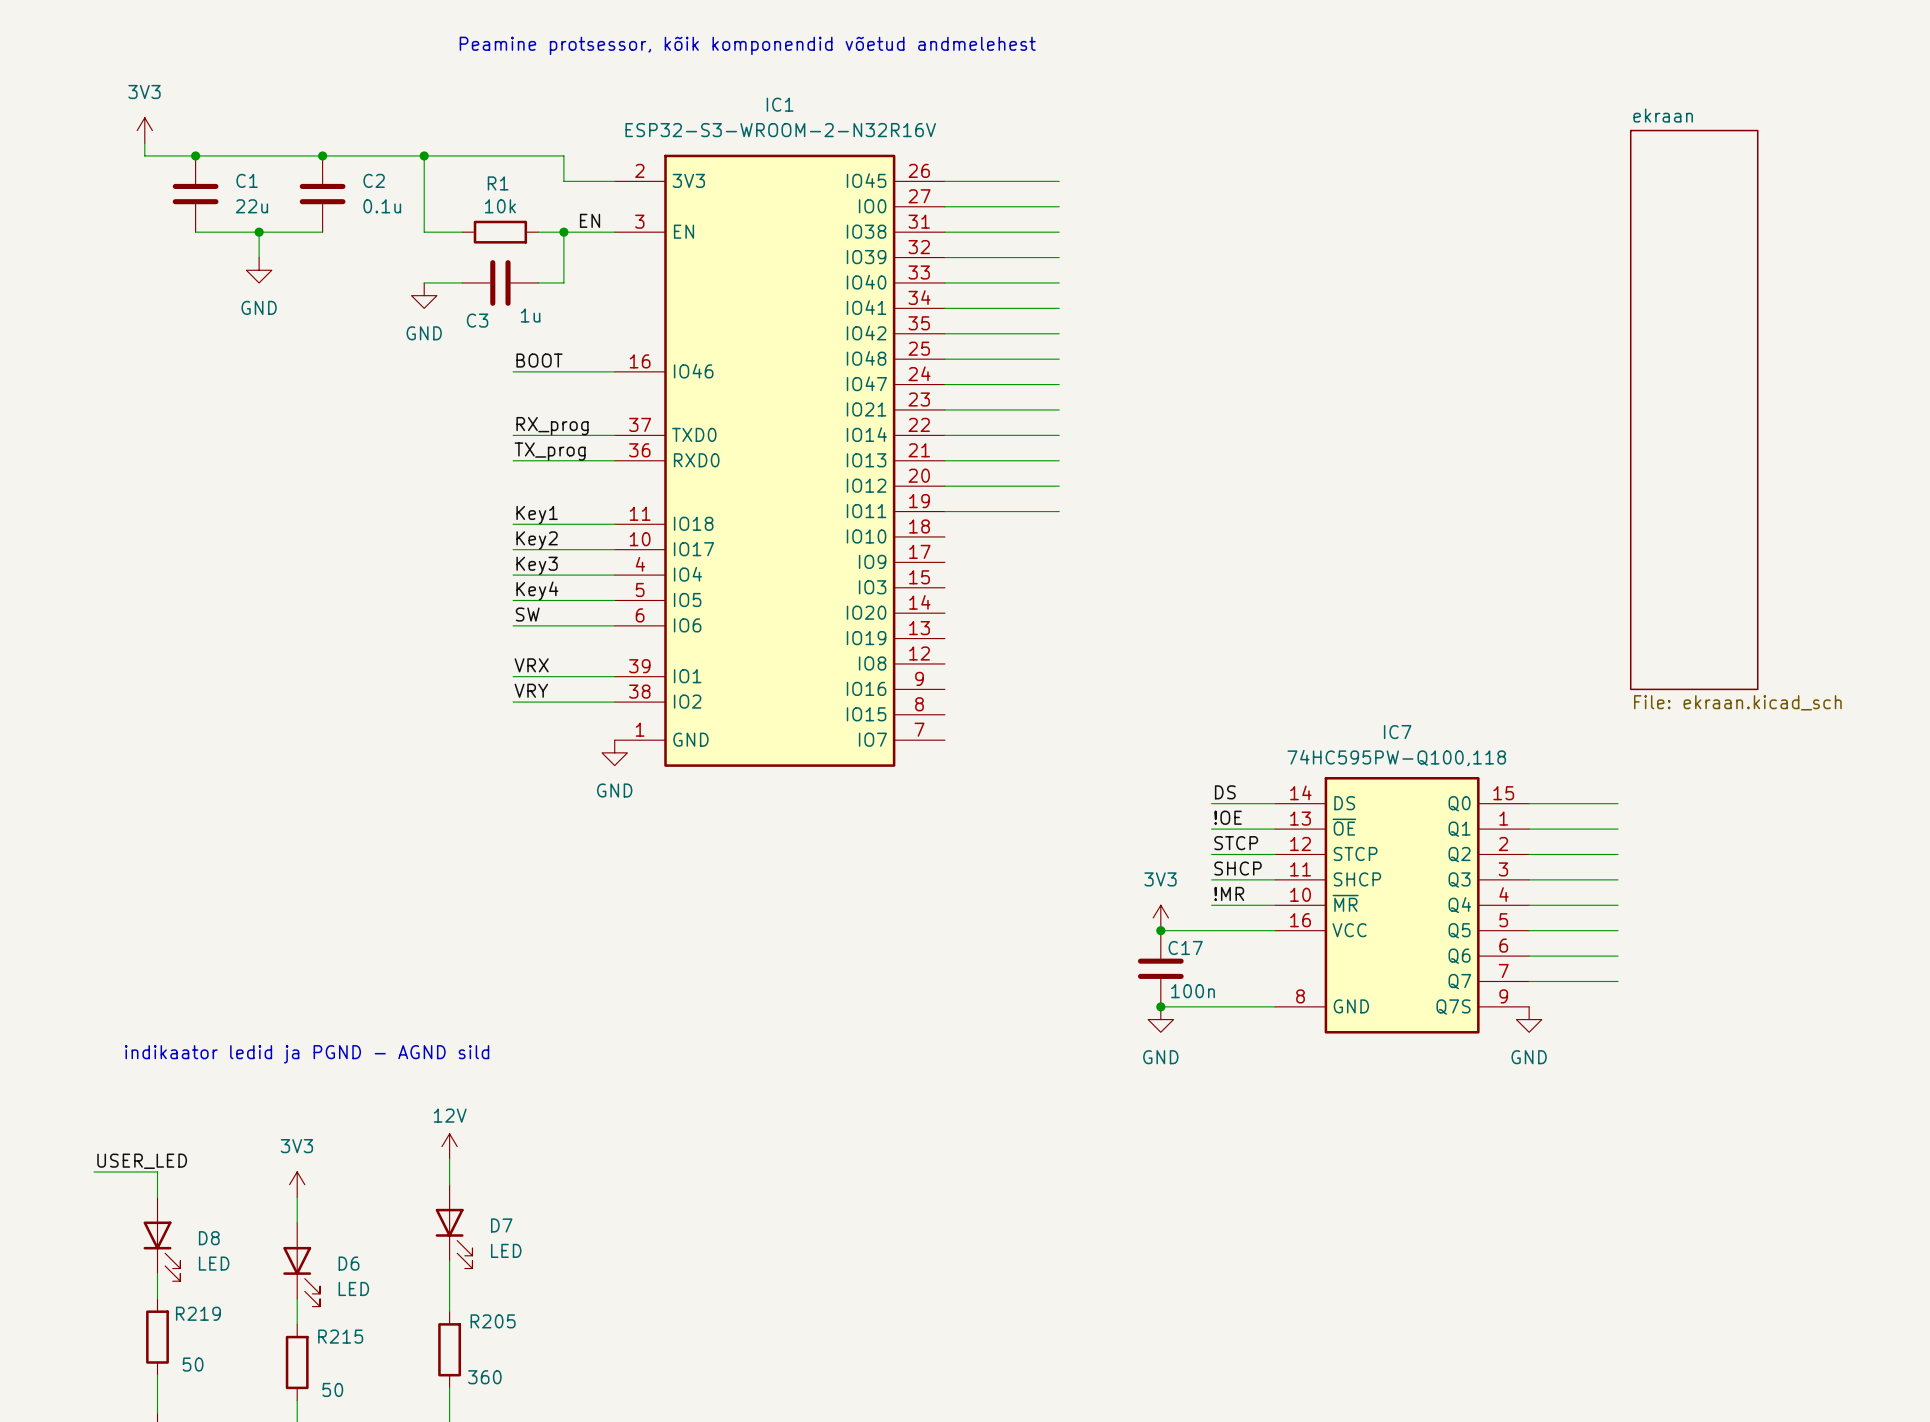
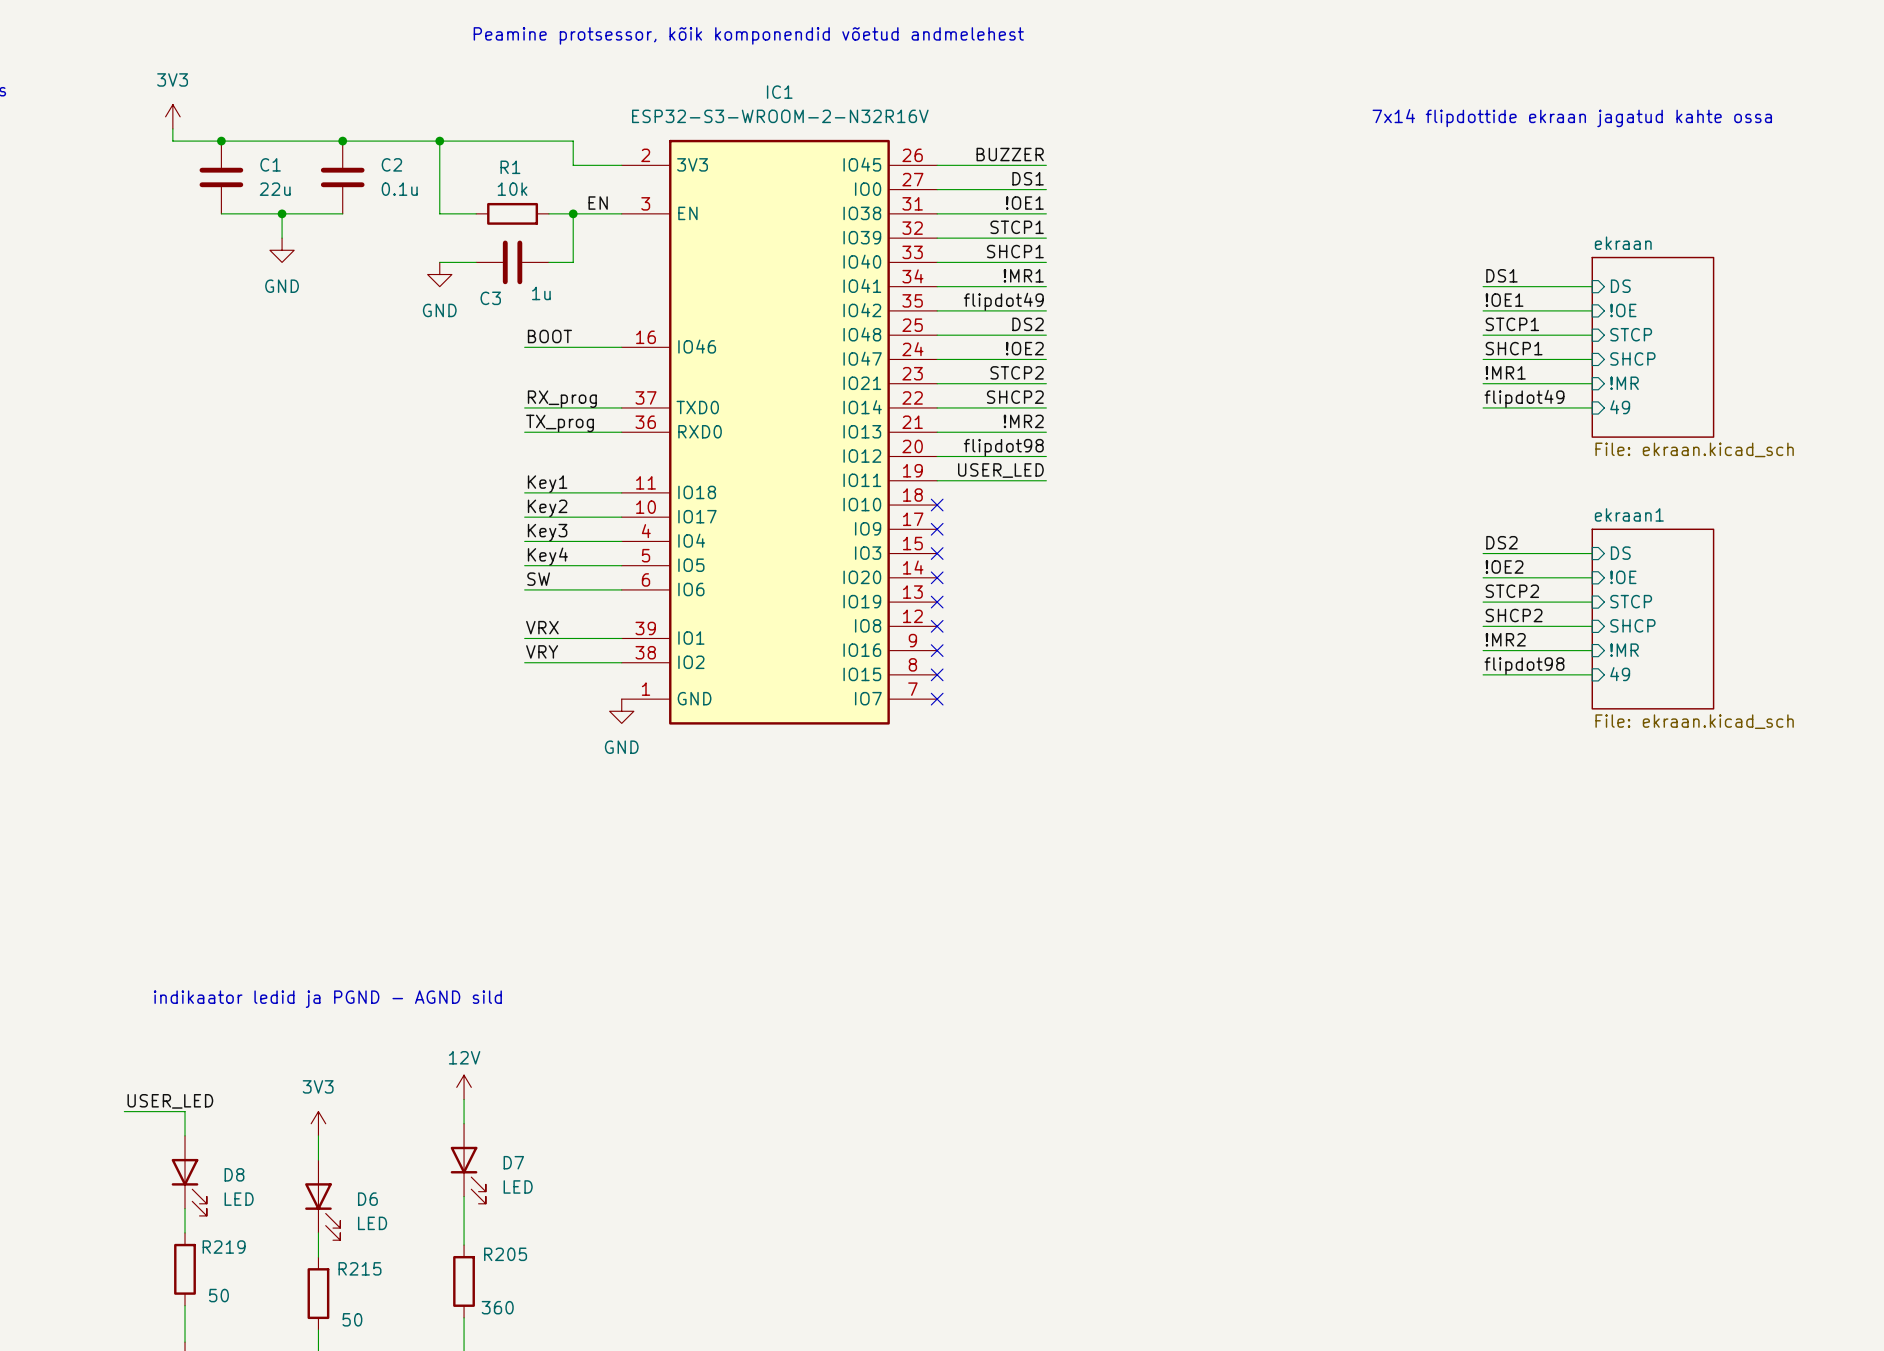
text: none -> 7x14 flipdottide ekraan jagatud kahte ossa (1572, 118)
label: none -> BUZZER (1010, 154)
label: none -> DS1 (1028, 178)
label: none -> !OE1 (1024, 203)
label: none -> STCP1 (1017, 227)
label: none -> SHCP1 (1015, 251)
label: none -> !MR1 (1023, 275)
label: none -> DS1 (1501, 275)
sheet pin: none -> DS (1620, 286)
wire: none -> (1483, 286) (1592, 286)
label: none -> !OE1 (1504, 300)
label: none -> flipdot49 (1003, 301)
wire: none -> (1483, 310) (1592, 310)
sheet pin: none -> !OE (1623, 310)
label: none -> DS2 (1028, 324)
label: none -> STCP1 (1512, 324)
sheet pin: none -> STCP (1631, 334)
wire: none -> (1483, 335) (1592, 335)
sheet ekraan: none -> File: ekraan.kicad_sch (1652, 347)
label: none -> !OE2 (1024, 348)
label: none -> SHCP1 (1514, 348)
wire: none -> (1483, 359) (1592, 359)
sheet pin: none -> SHCP (1632, 358)
label: none -> STCP2 (1017, 372)
label: none -> !MR1 (1505, 372)
wire: none -> (1483, 383) (1592, 383)
sheet pin: none -> !MR (1624, 383)
sheet ekraan: File: ekraan.kicad_sch (1694, 409) -> none
label: none -> SHCP2 (1015, 397)
label: none -> flipdot49 (1524, 398)
sheet pin: none -> 49 (1620, 407)
wire: none -> (1483, 407) (1592, 407)
label: none -> !MR2 (1023, 421)
label: none -> flipdot98 (1003, 447)
label: none -> USER_LED (1000, 470)
no-connect mark: none -> (937, 505)
no-connect mark: none -> (937, 529)
label: none -> DS2 (1501, 542)
no-connect mark: none -> (937, 553)
wire: none -> (1483, 553) (1592, 553)
sheet pin: none -> DS (1620, 553)
label: none -> !OE2 (1504, 566)
sheet pin: none -> !OE (1623, 577)
no-connect mark: none -> (937, 577)
wire: none -> (1483, 577) (1592, 577)
label: none -> STCP2 (1512, 591)
no-connect mark: none -> (937, 602)
wire: none -> (1483, 602) (1592, 602)
sheet pin: none -> STCP (1631, 601)
label: none -> SHCP2 (1514, 615)
sheet ekraan1: none -> File: ekraan.kicad_sch (1652, 619)
no-connect mark: none -> (937, 626)
wire: none -> (1483, 626) (1592, 626)
sheet pin: none -> SHCP (1632, 625)
label: none -> !MR2 (1505, 639)
sheet pin: none -> !MR (1624, 650)
no-connect mark: none -> (937, 650)
wire: none -> (1483, 650) (1592, 650)
label: none -> flipdot98 (1524, 666)
no-connect mark: none -> (937, 674)
wire: none -> (1483, 674) (1592, 674)
sheet pin: none -> 49 (1620, 674)
no-connect mark: none -> (937, 699)
label: DS (1225, 792) -> none
wire: (1211, 803) (1275, 803) -> none
wire: (1529, 803) (1618, 803) -> none
label: !OE (1228, 817) -> none
wire: (1211, 829) (1275, 829) -> none
wire: (1529, 829) (1618, 829) -> none
label: STCP (1236, 843) -> none
wire: (1211, 854) (1275, 854) -> none
wire: (1529, 854) (1618, 854) -> none
label: SHCP (1238, 868) -> none
wire: (1211, 879) (1275, 879) -> none
wire: (1529, 879) (1618, 879) -> none
label: !MR (1229, 893) -> none
wire: (1211, 905) (1275, 905) -> none
IC7: 74HC595PW-Q100,118 (1402, 905) -> none
wire: (1529, 905) (1618, 905) -> none
power symbol: 3V3 (1160, 917) -> none
wire: (1160, 930) (1275, 930) -> none
junction: (1160, 930) -> none
wire: (1529, 930) (1618, 930) -> none
wire: (1529, 956) (1618, 956) -> none
C17: 100n (1160, 968) -> none
wire: (1529, 981) (1618, 981) -> none
wire: (1160, 1006) (1275, 1006) -> none
junction: (1160, 1006) -> none
power symbol: GND (1160, 1019) -> none
power symbol: GND (1529, 1019) -> none

